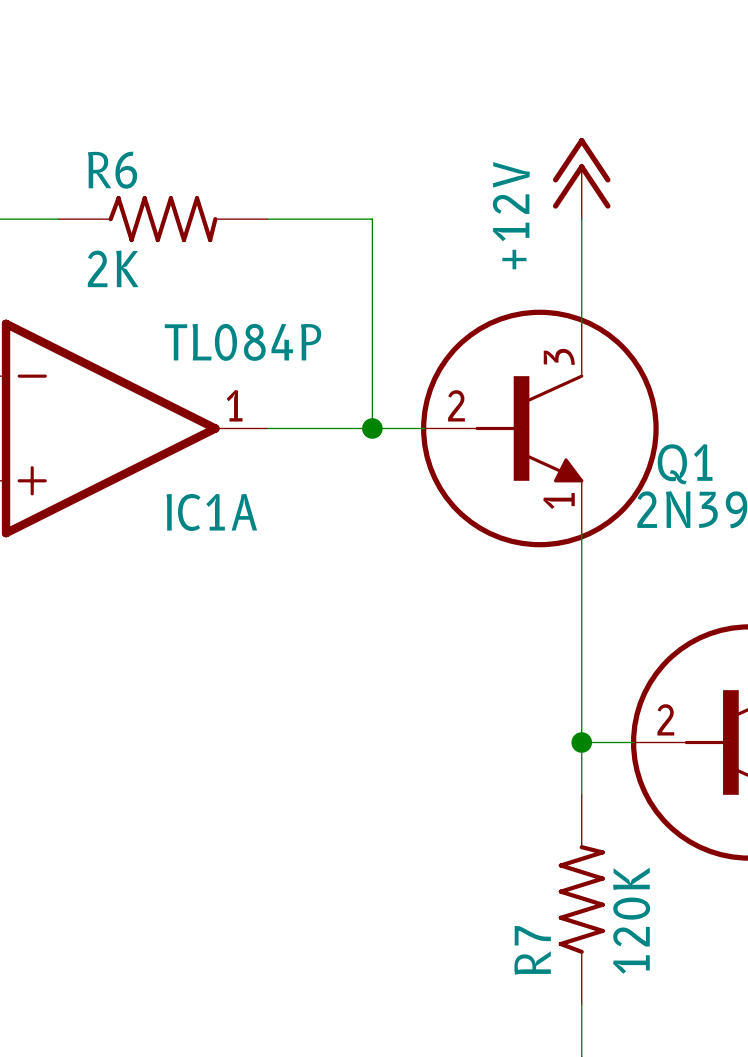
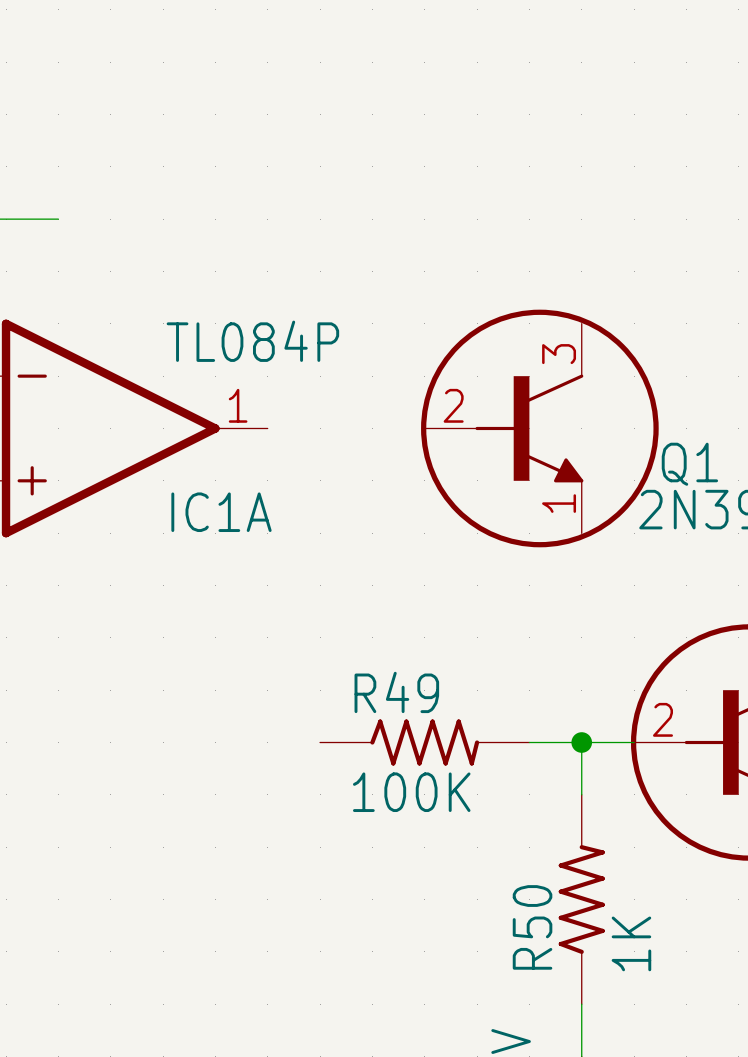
power symbol: +12V (581, 178) -> none
R6: 2K (163, 219) -> none
wire: (267, 219) (372, 219) (372, 428) -> none
wire: (581, 219) (581, 323) -> none
wire: (267, 428) (424, 428) -> none
junction: (372, 428) -> none
wire: (581, 533) (581, 742) -> (529, 742) (581, 742)
R49: none -> 100K (424, 742)
R7 value: 120K (631, 920) -> 1K (631, 943)
R7 name: R7 (532, 950) -> R50 (532, 927)

